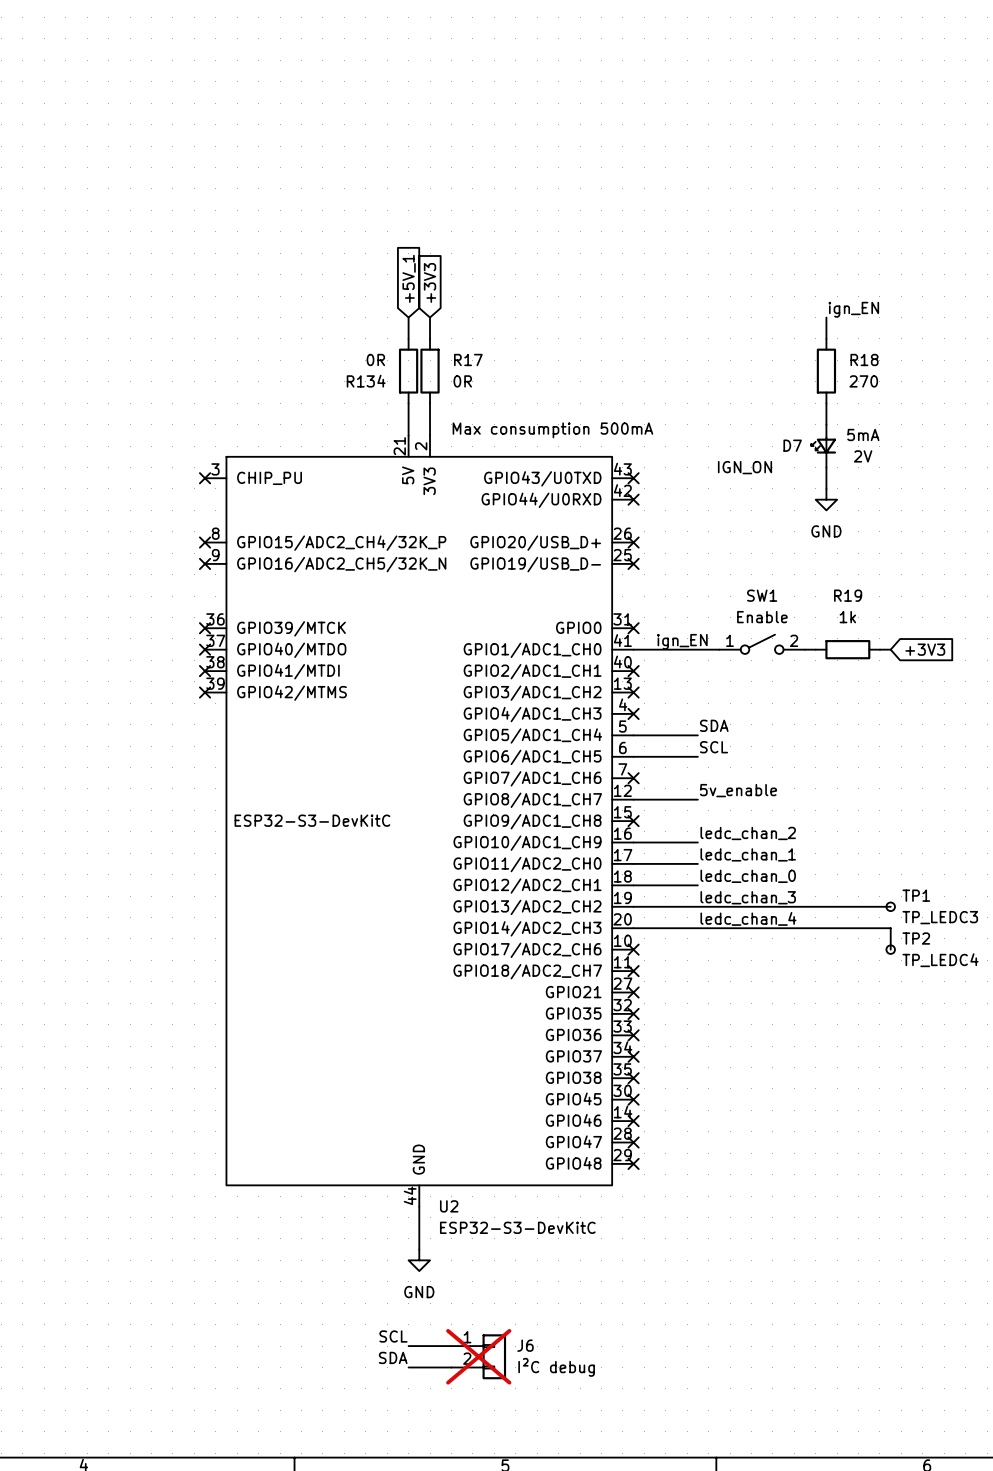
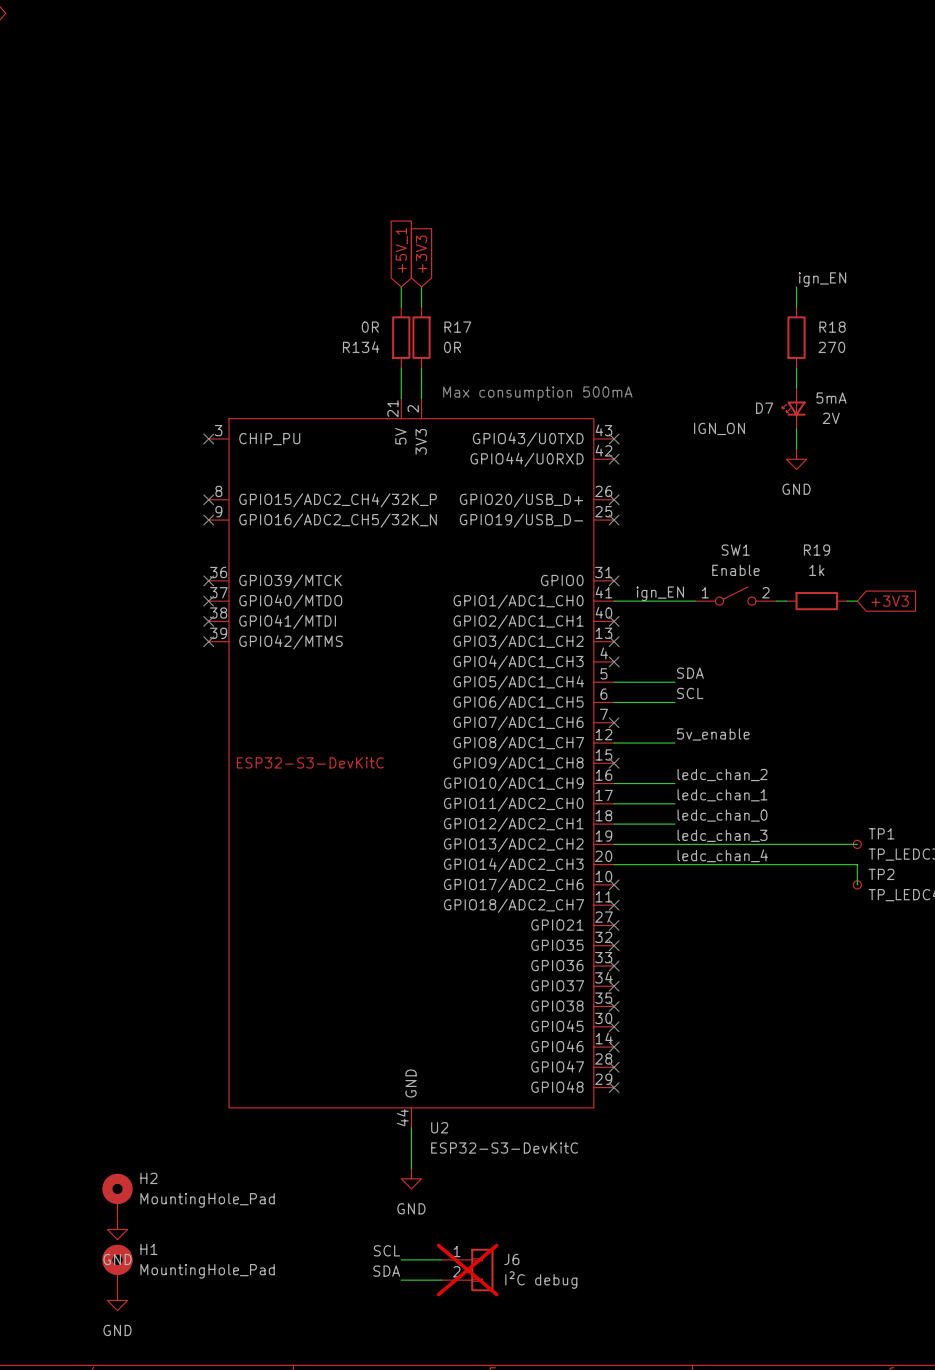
H2: none -> MountingHole_Pad (117, 1196)
power symbol: none -> GND (117, 1229)
H1: none -> MountingHole_Pad (117, 1267)
power symbol: none -> GND (117, 1300)

